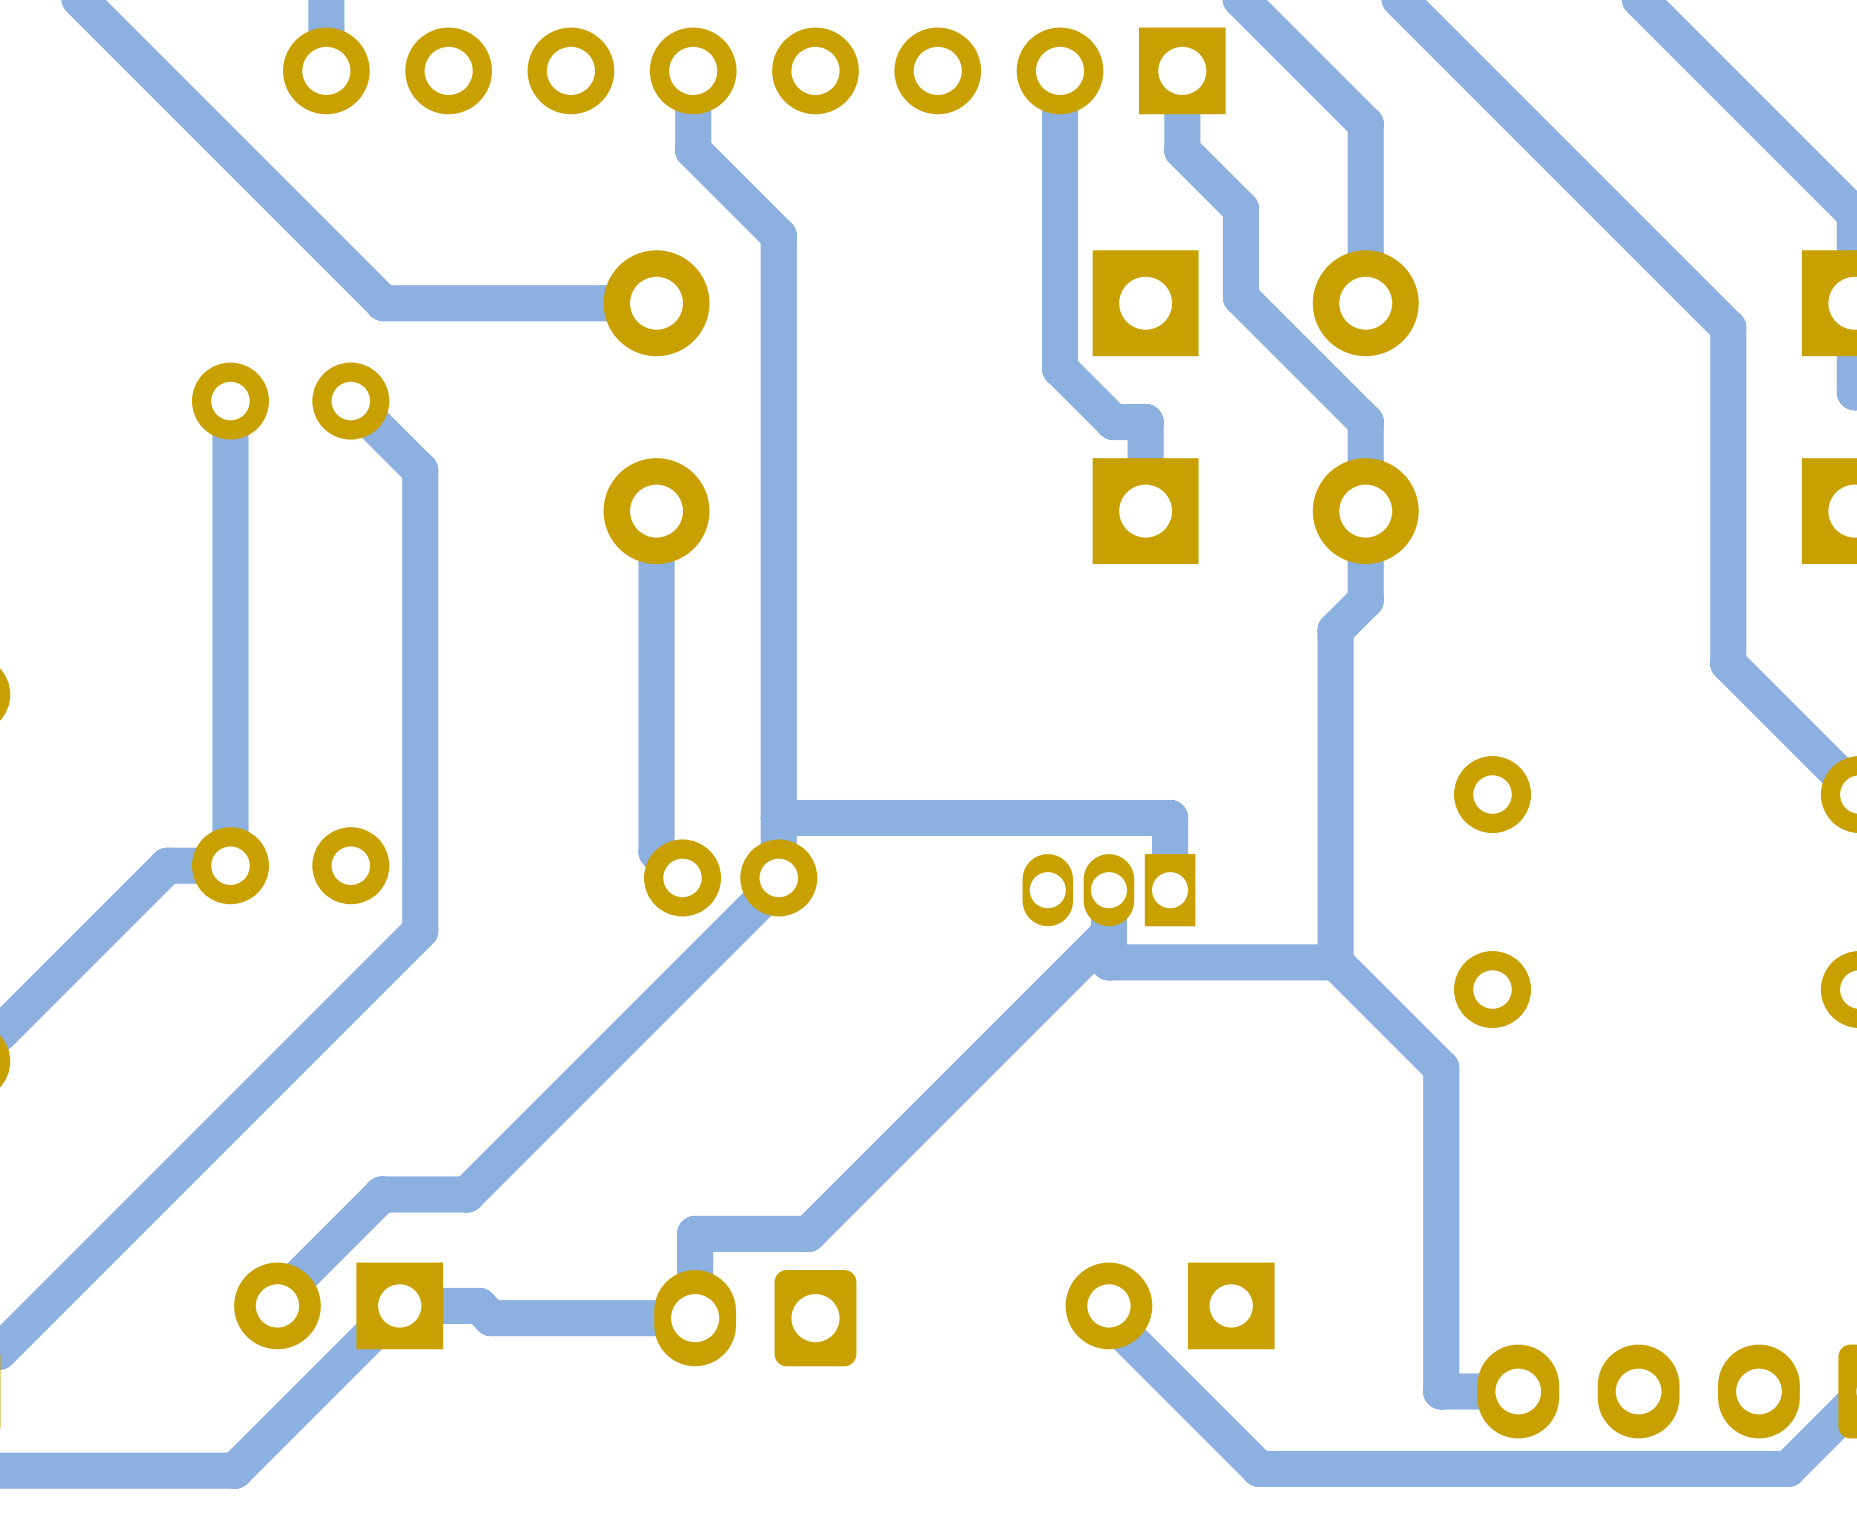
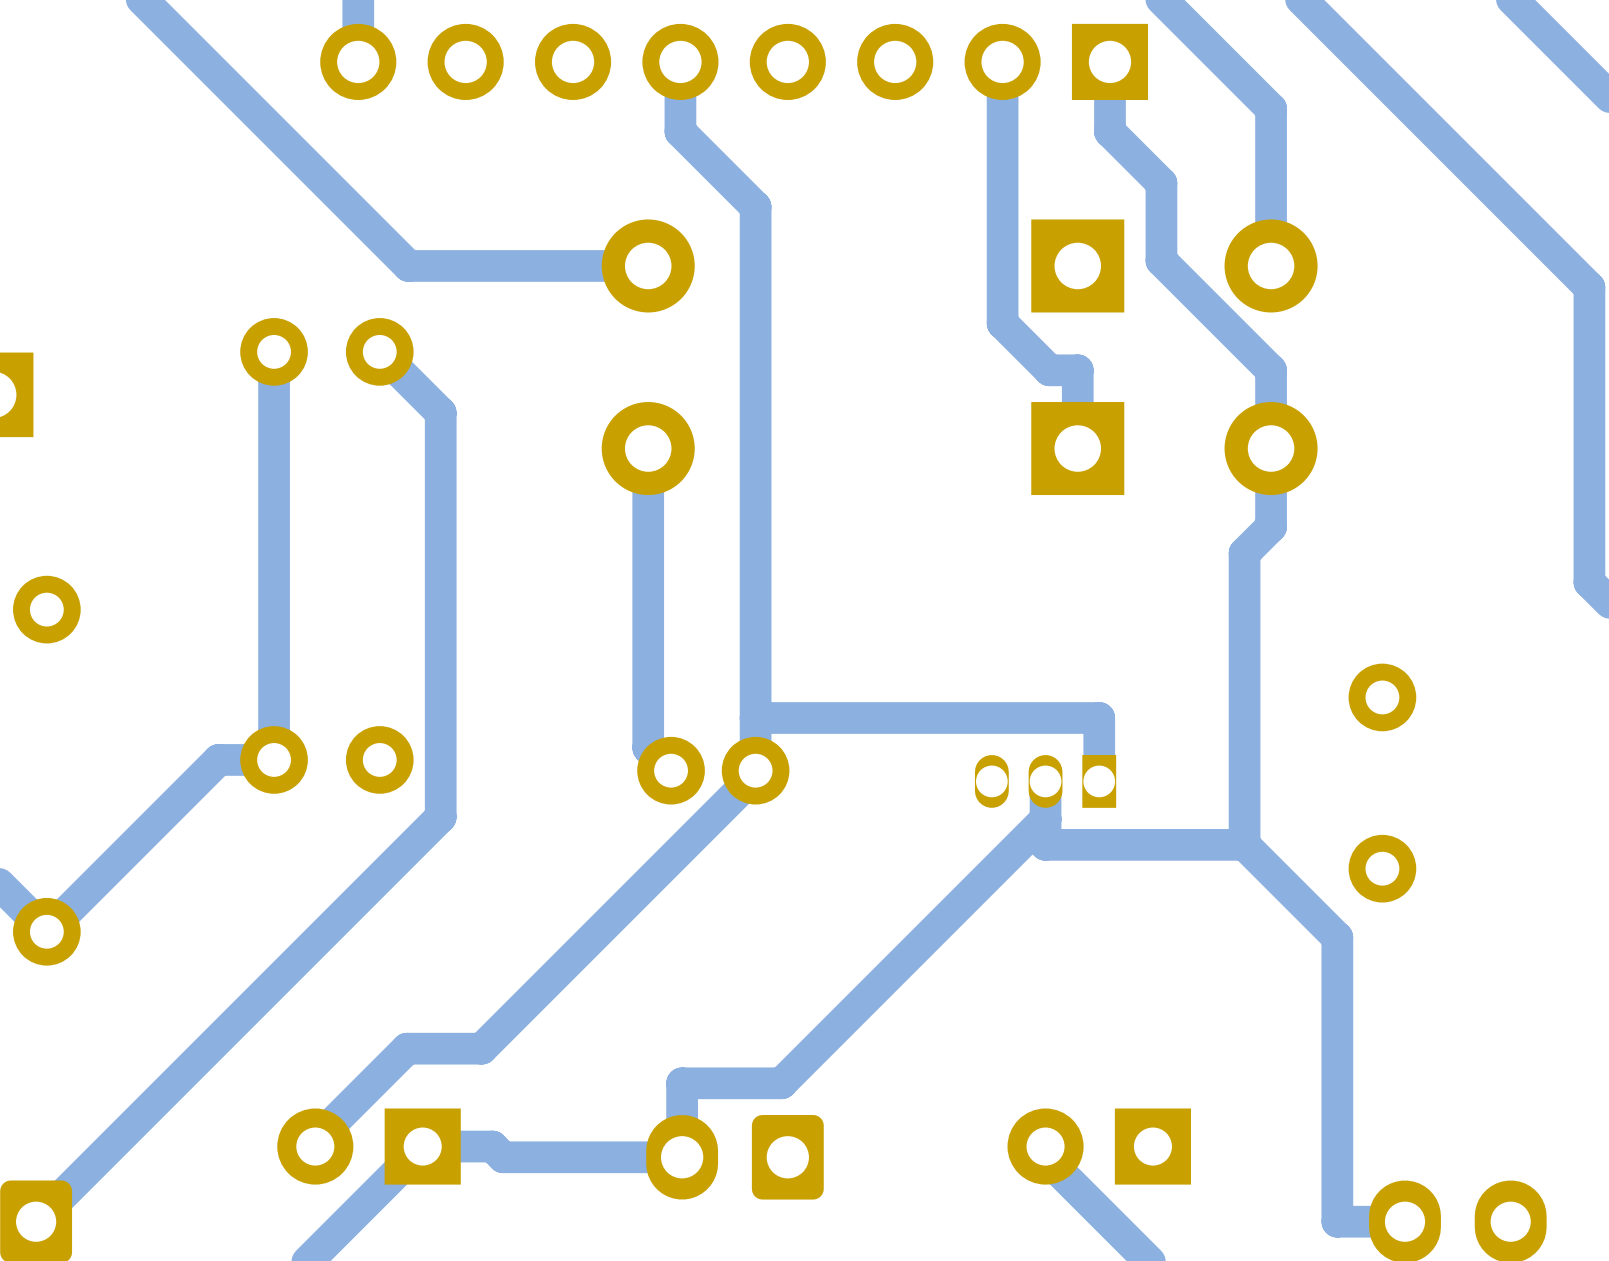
part footprint: [1022, 854, 1196, 927] -> [974, 755, 1117, 808]

